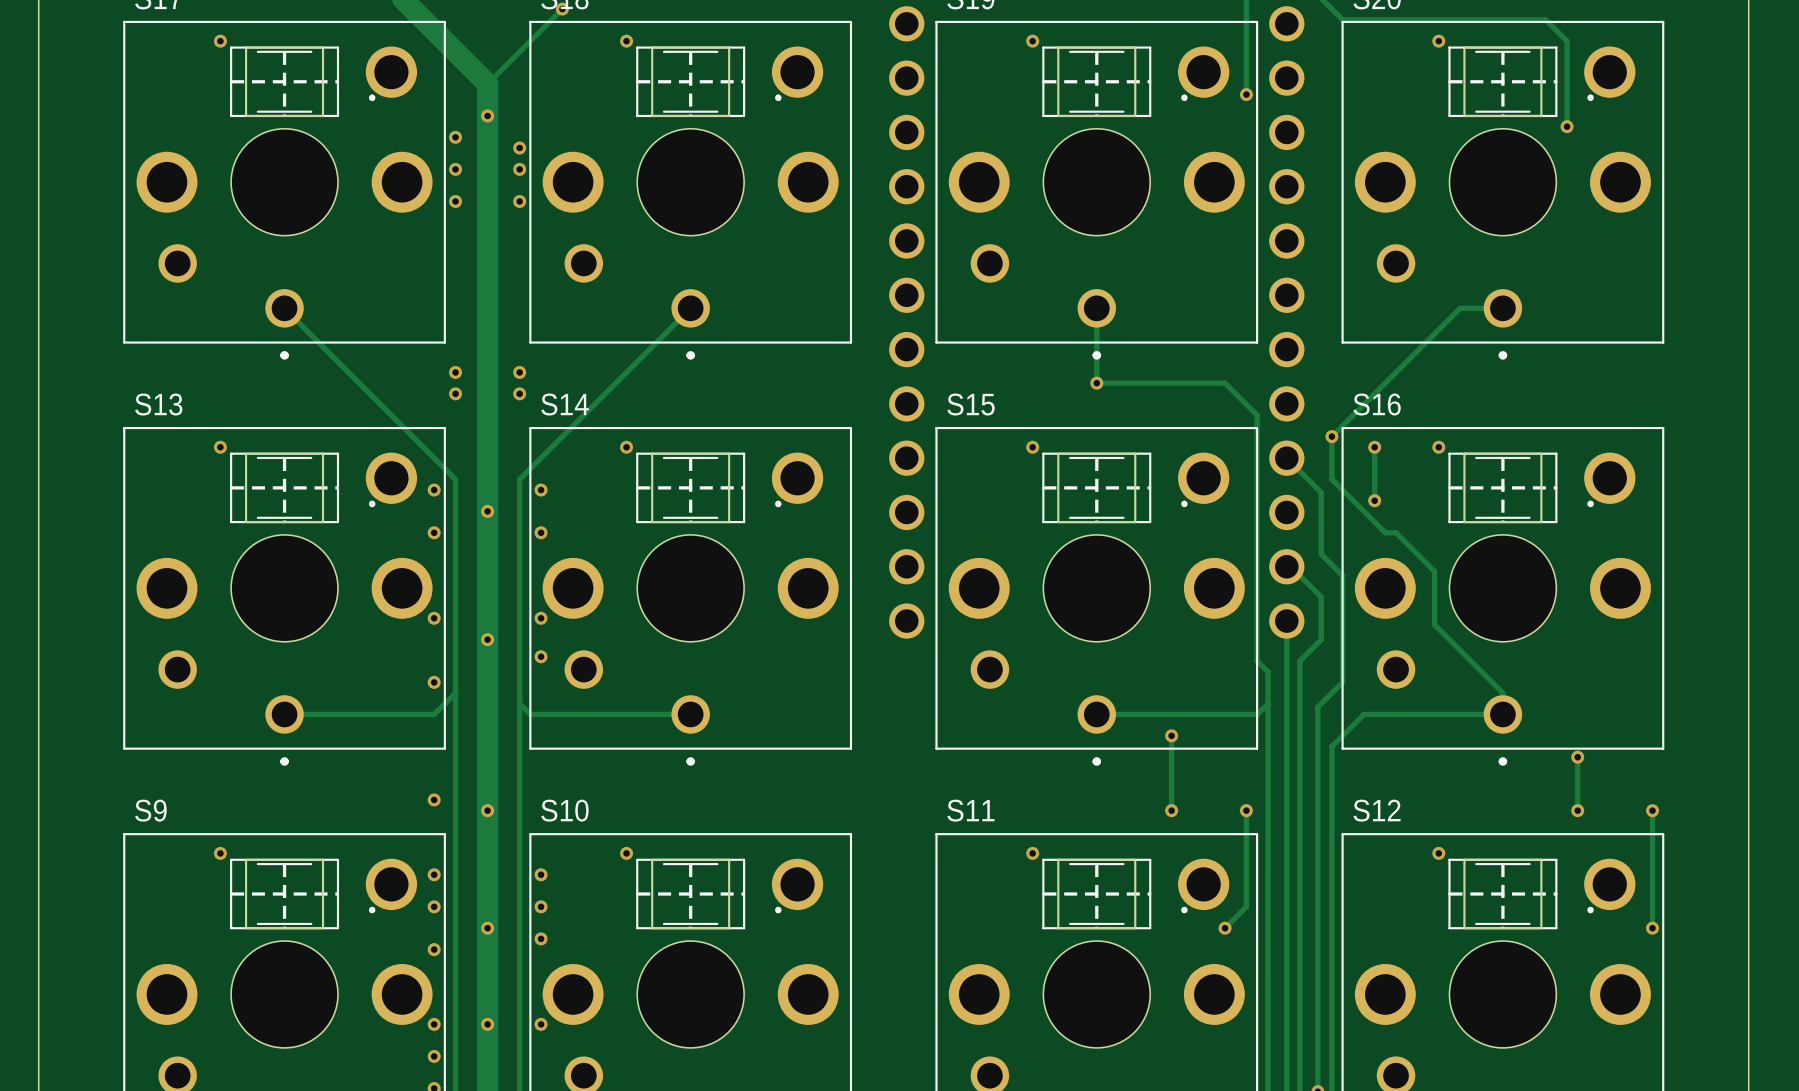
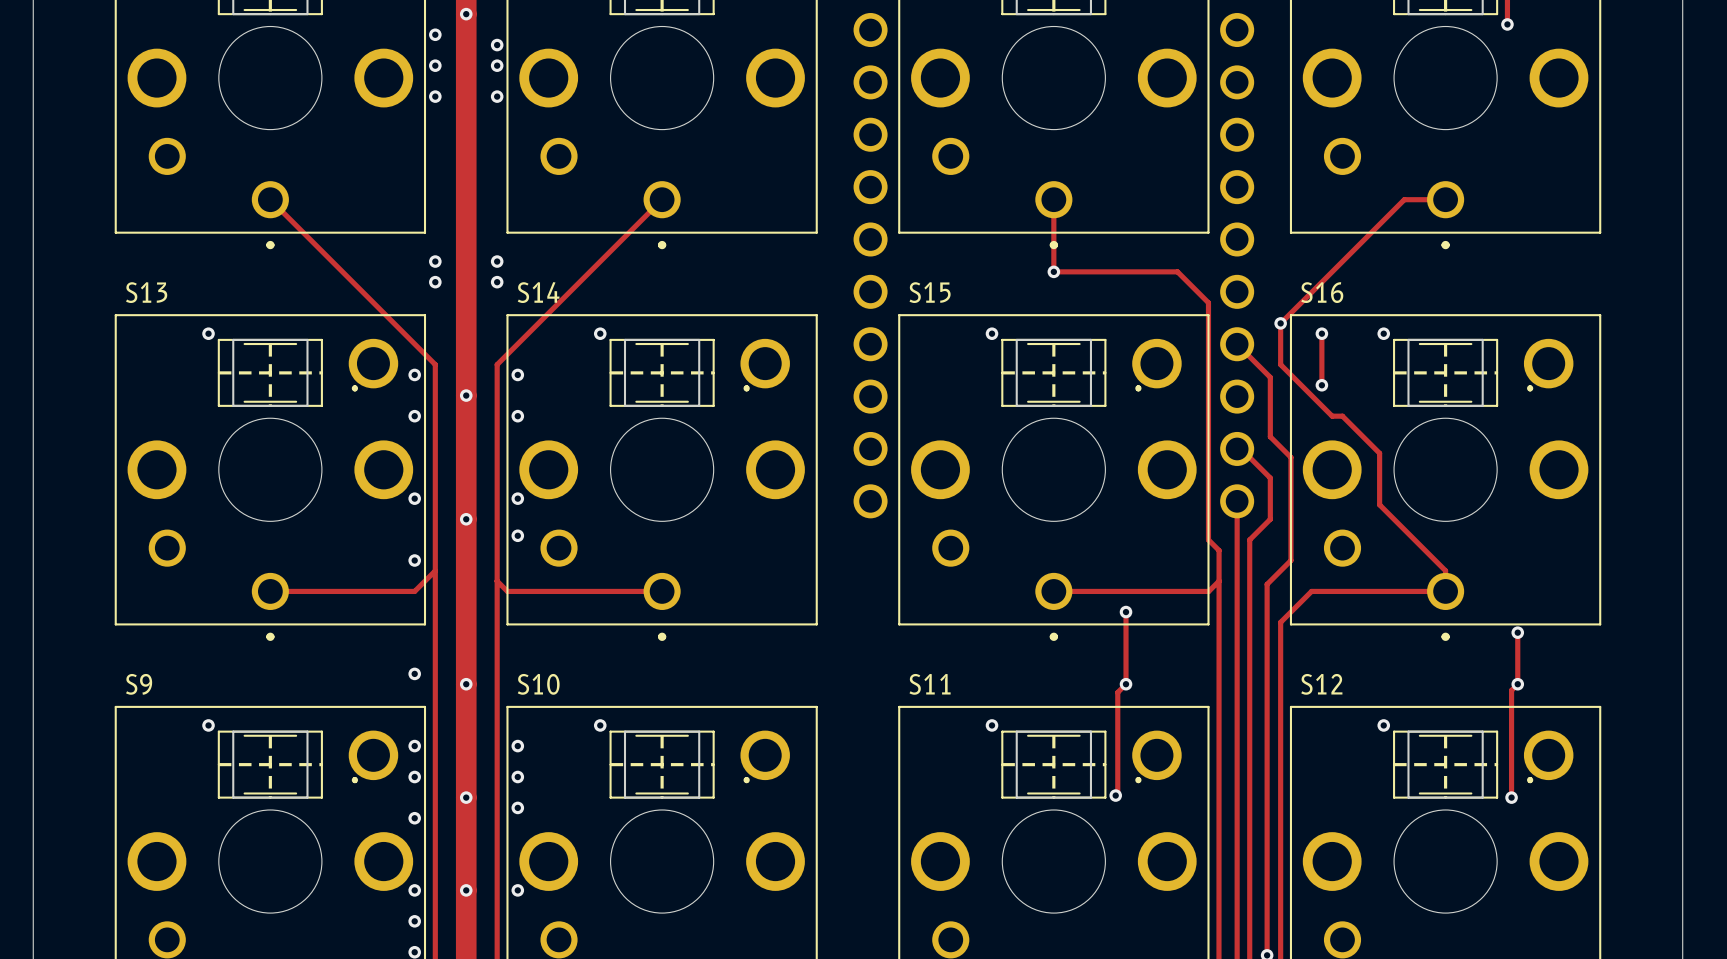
track: none -> (1126, 684) (1117, 692) (1117, 793) (1115, 795)
track: (1246, 810) (1246, 906) (1225, 928) -> none
via: (1246, 810) -> none
track: none -> (1517, 684) (1511, 690) (1511, 797)
track: (1652, 810) (1652, 928) -> none
via: (1652, 810) -> none
via position: (1225, 928) -> (1115, 795)
via: none -> (1511, 797)
via: (1652, 928) -> none

